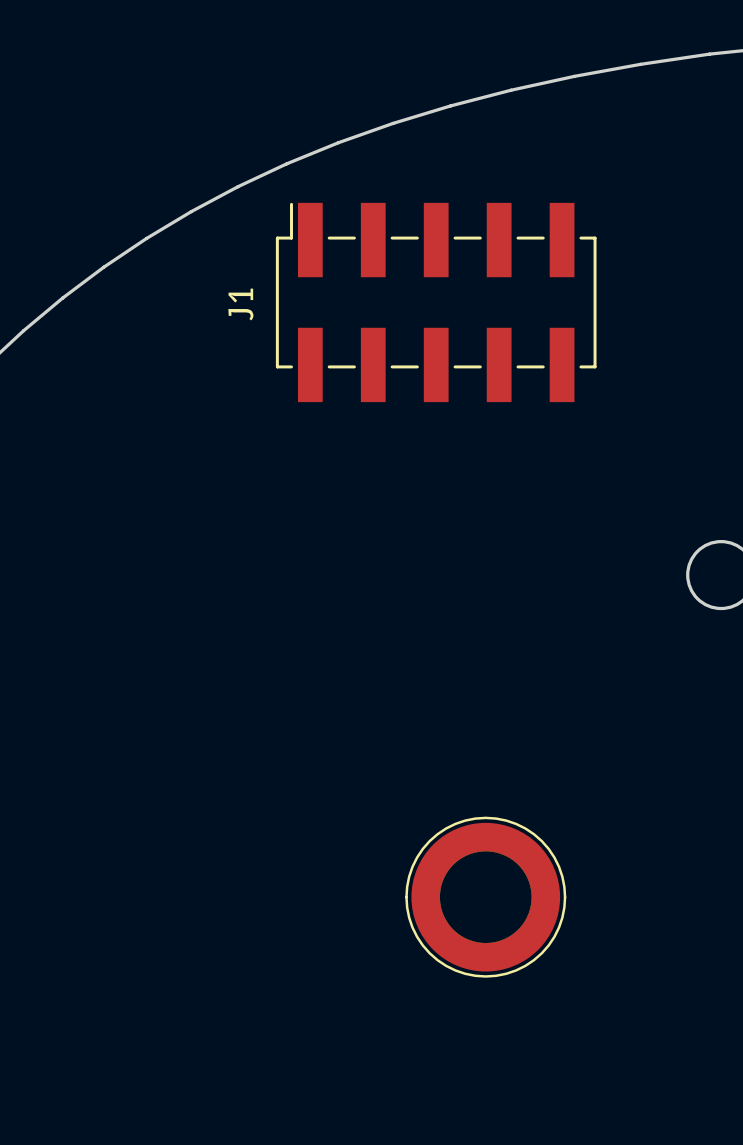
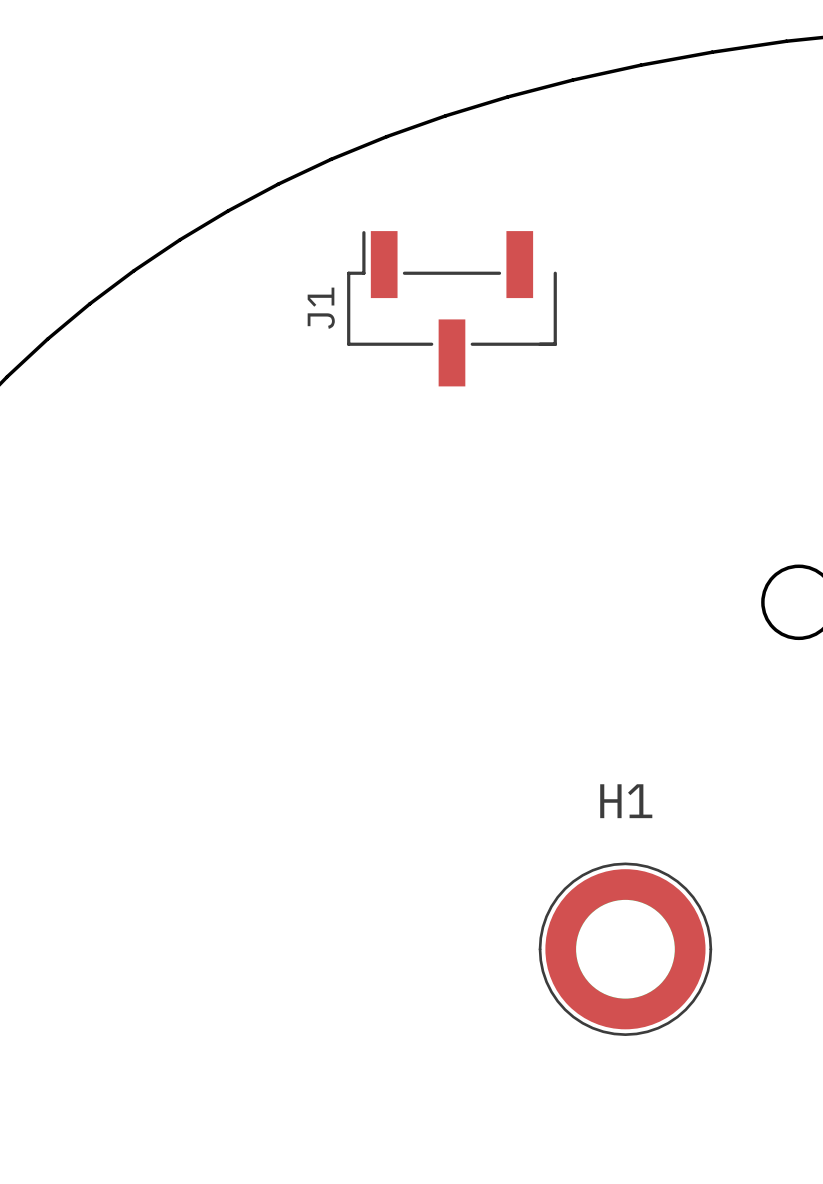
J1 footprint: [275, 202, 597, 403] -> [347, 231, 557, 387]
J1 name position: J1 (240, 304) -> J1 (321, 308)
part: (485, 897) -> none
H1: none -> (625, 949)

